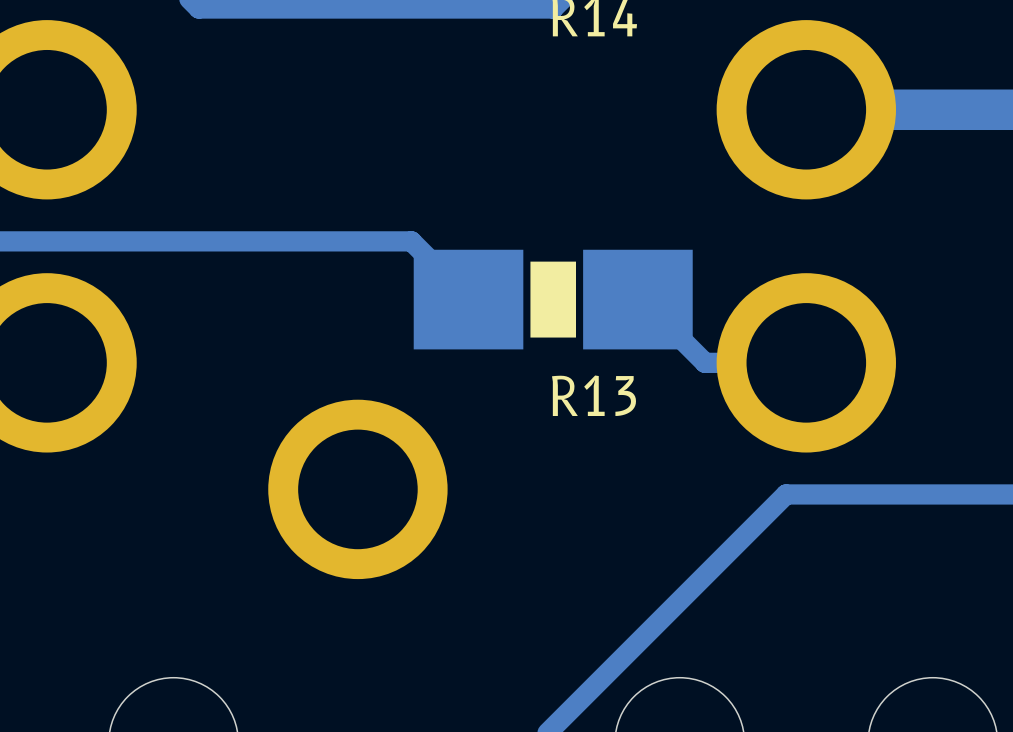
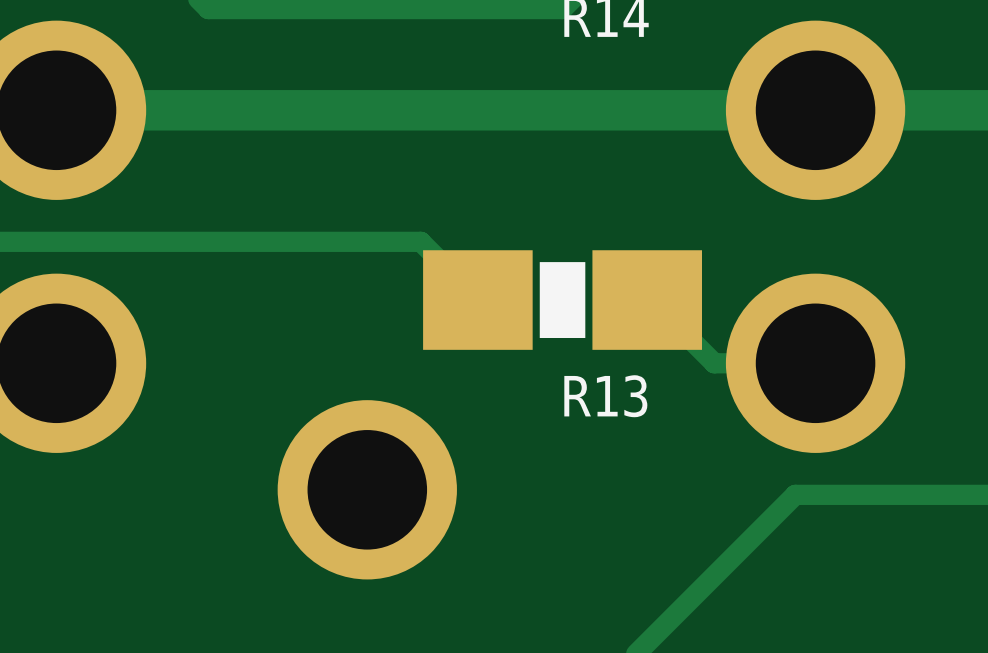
track: none -> (815, 110) (56, 110)

